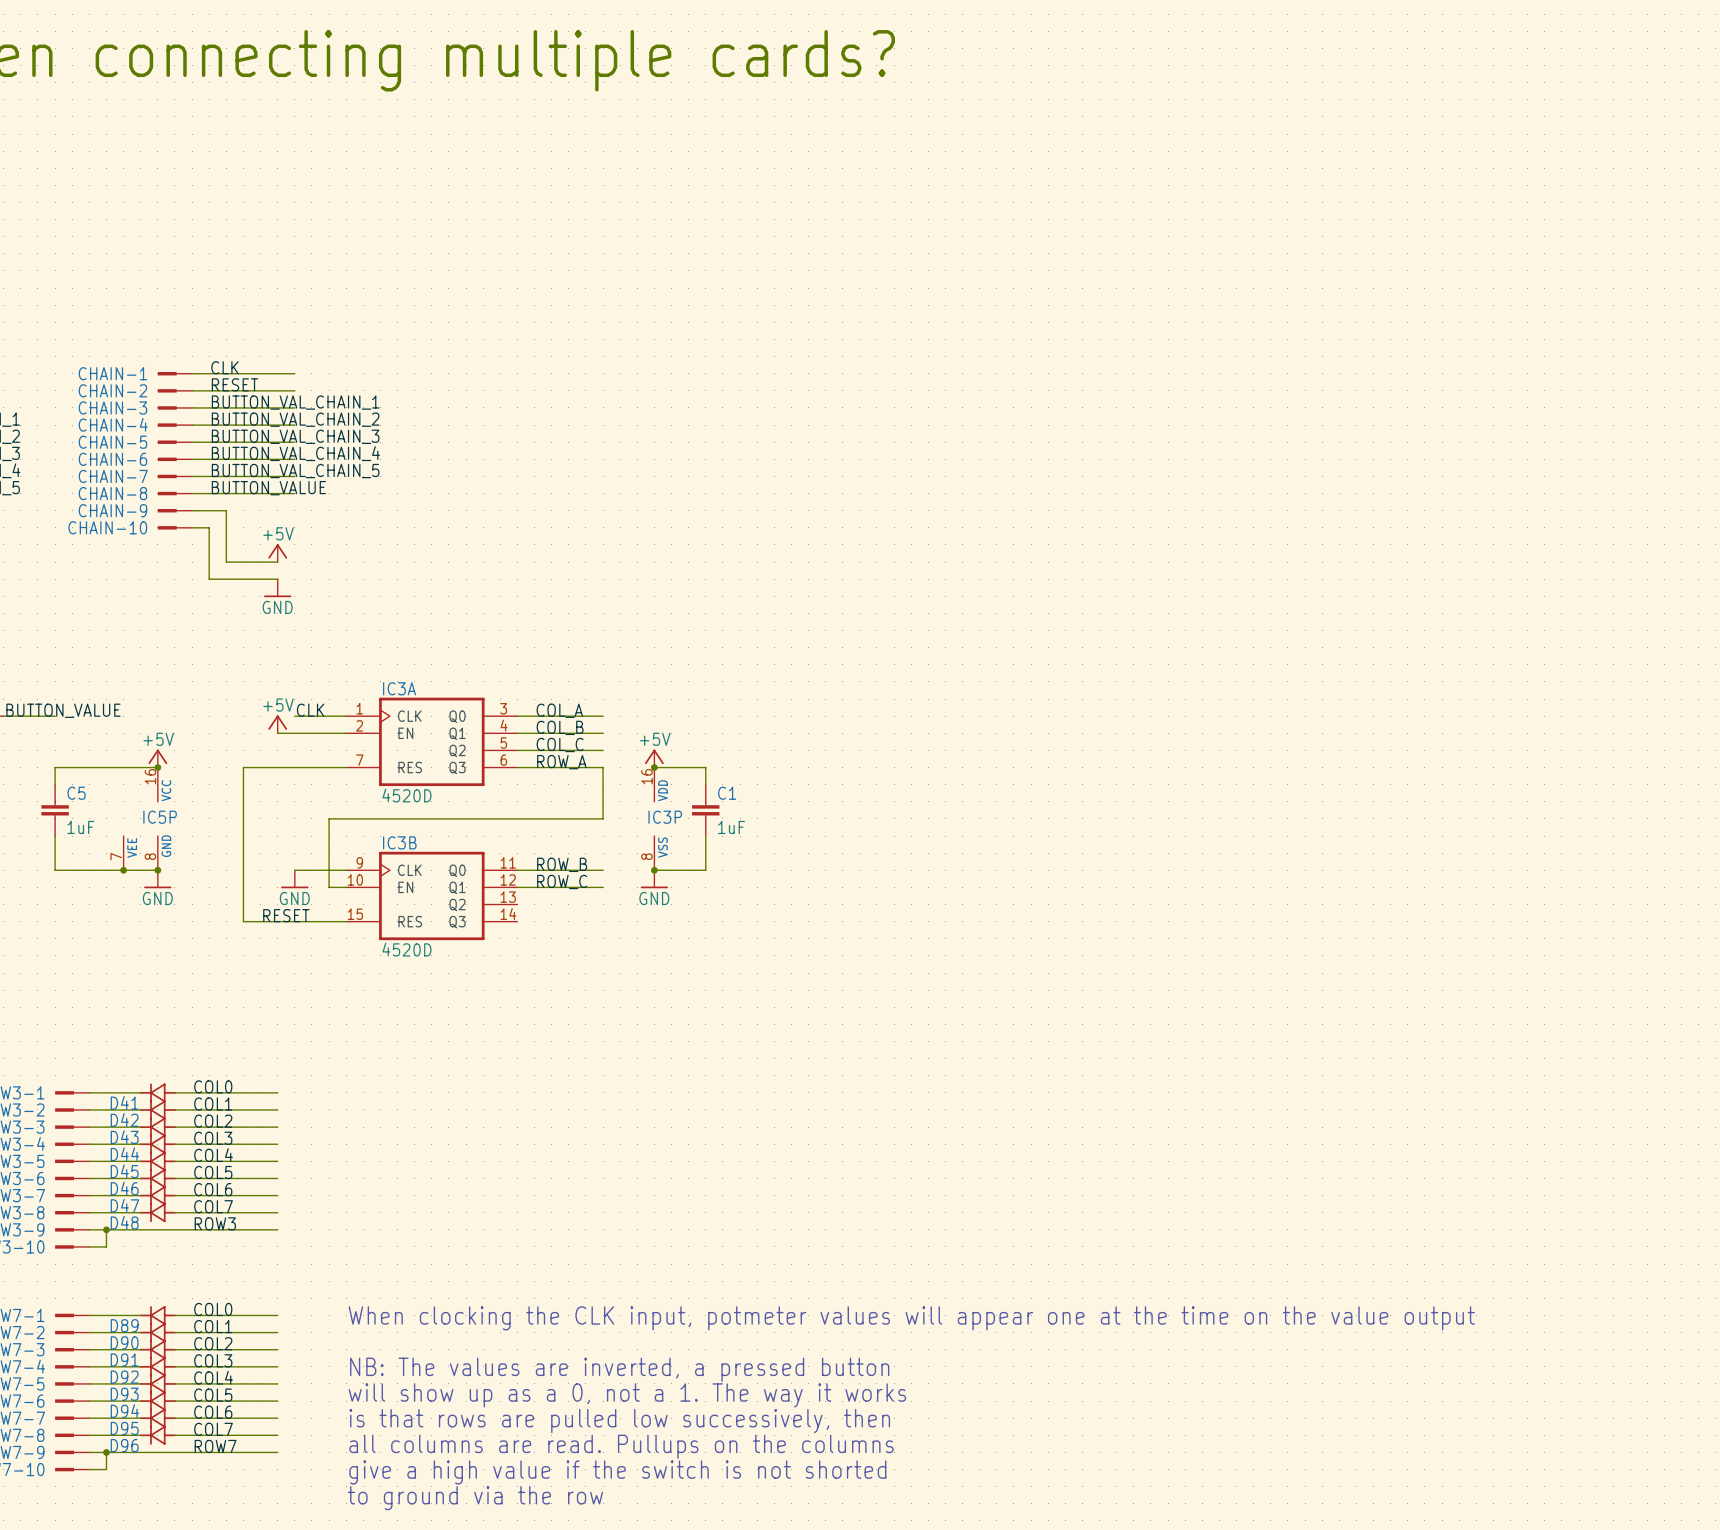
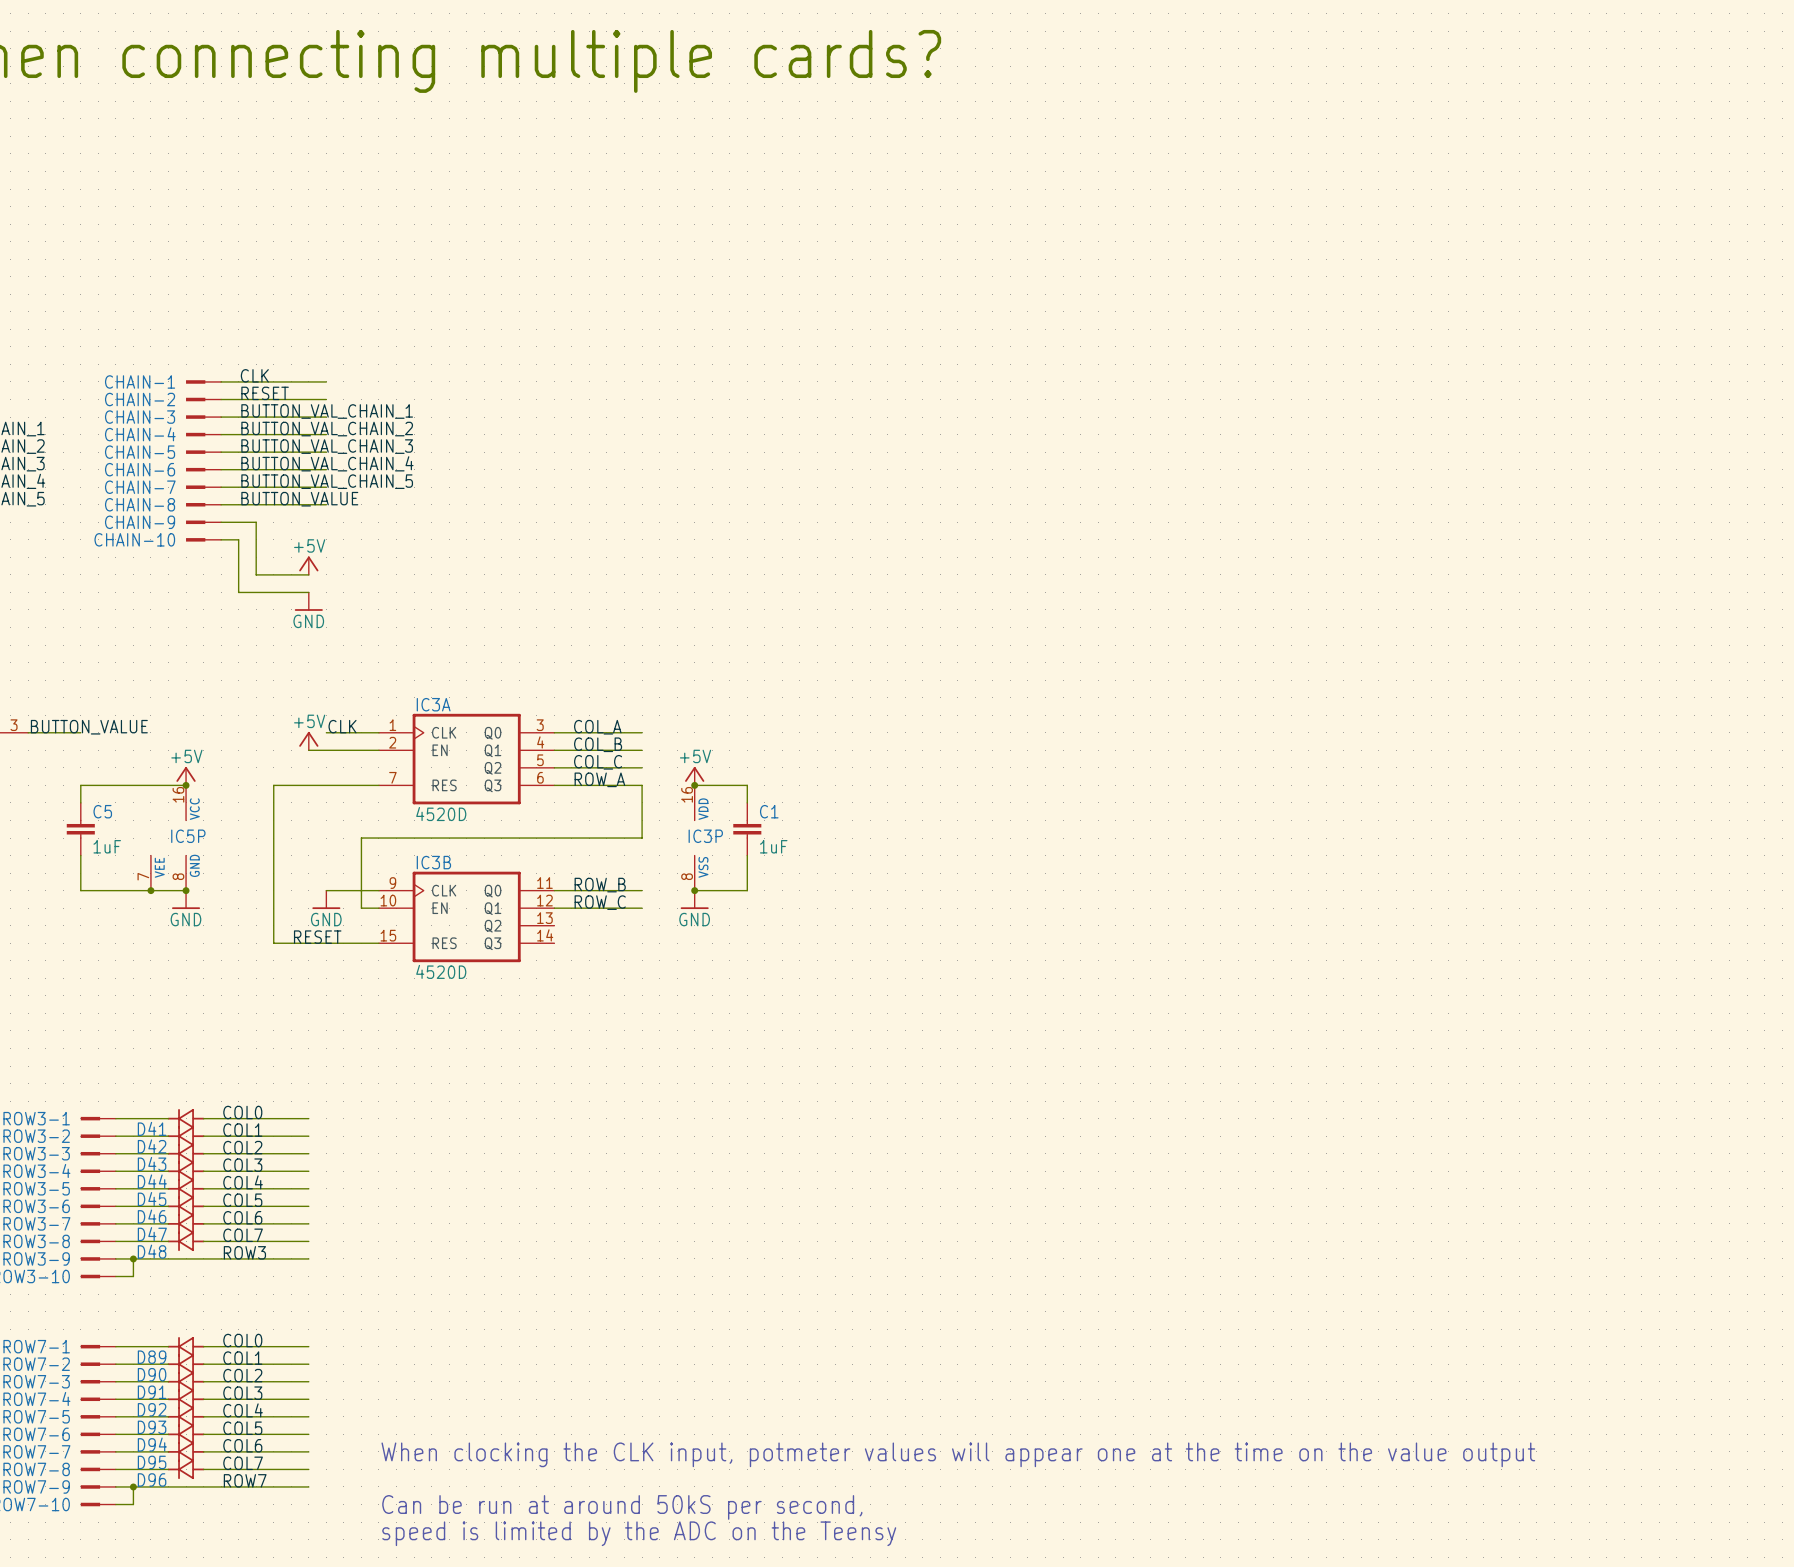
text: When clocking the CLK input, potmeter values will appear one at the time on the value output (911, 1318) -> none
text: NB: The values are inverted, a pressed button (619, 1369) -> none
text: will show up as a 0, not a 1. The way it works (627, 1395) -> none
text: is that rows are pulled low successively, then (619, 1421) -> When clocking the CLK input, potmeter values will appear one at the time on the value output (958, 1454)
text: all columns are read. Pullups on the columns (621, 1446) -> none
text: give a high value if the switch is not shorted (617, 1472) -> Can be run at around 50kS per second, (622, 1507)
text: to ground via the row (475, 1498) -> speed is limited by the ADC on the Teensy (639, 1533)

